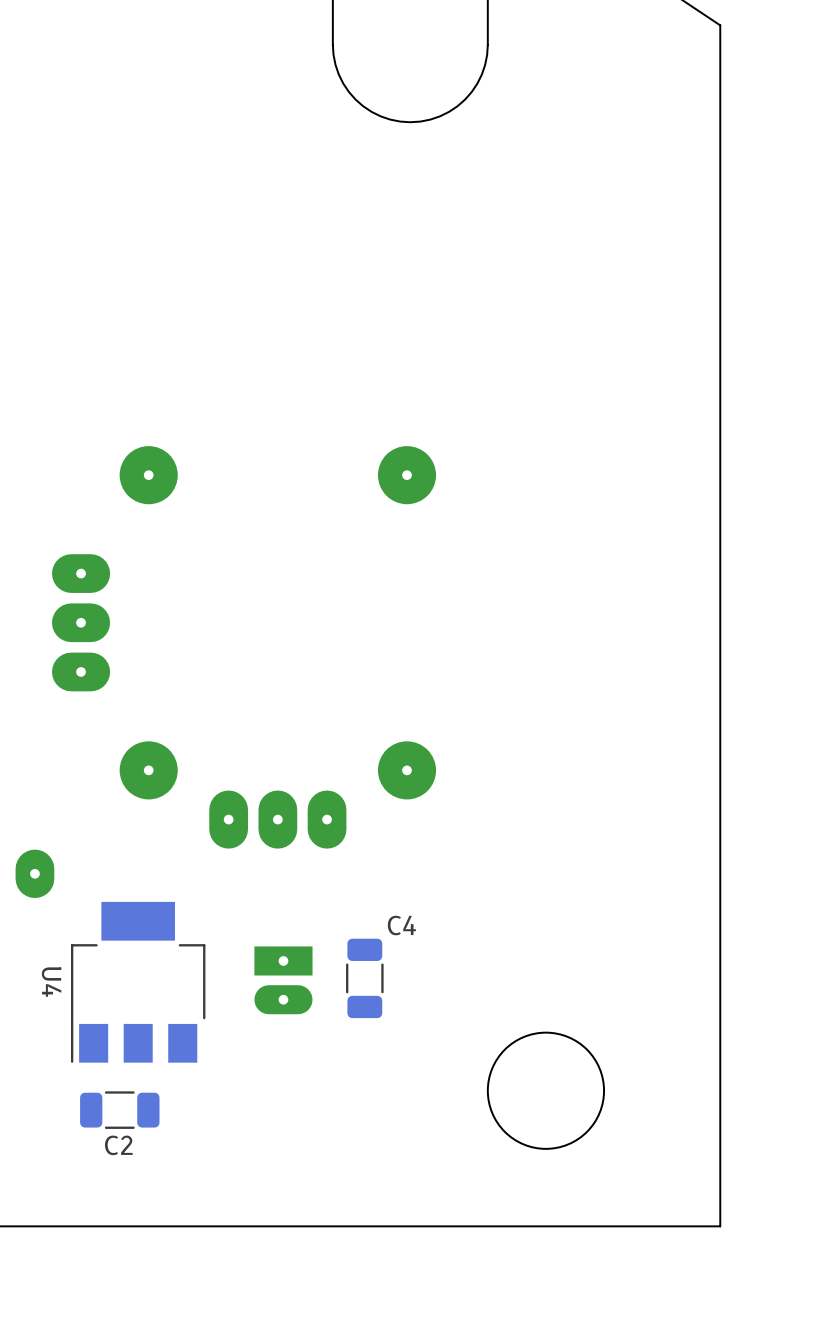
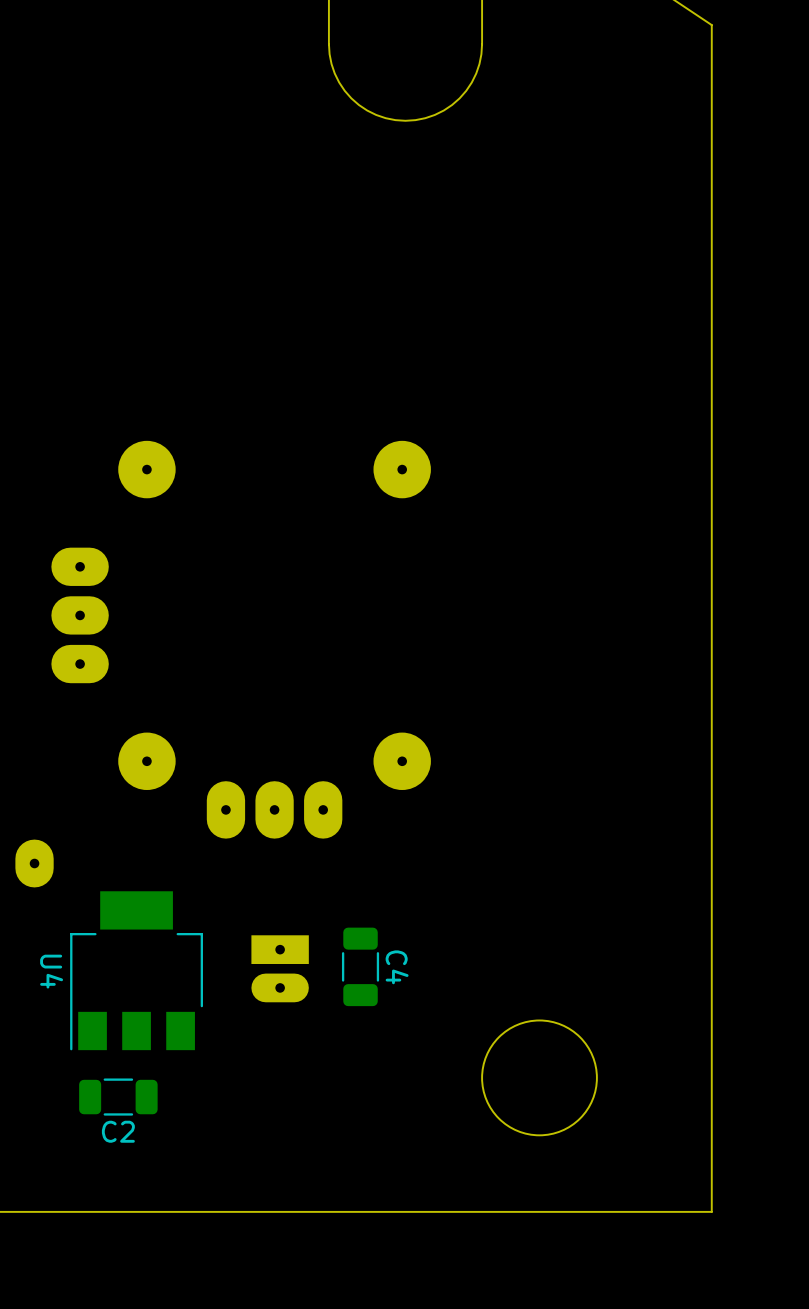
C4 name rotation: 0° (401, 925) -> 90° clockwise (397, 967)
C4 name position: C4 (401, 925) -> C4 (397, 967)

